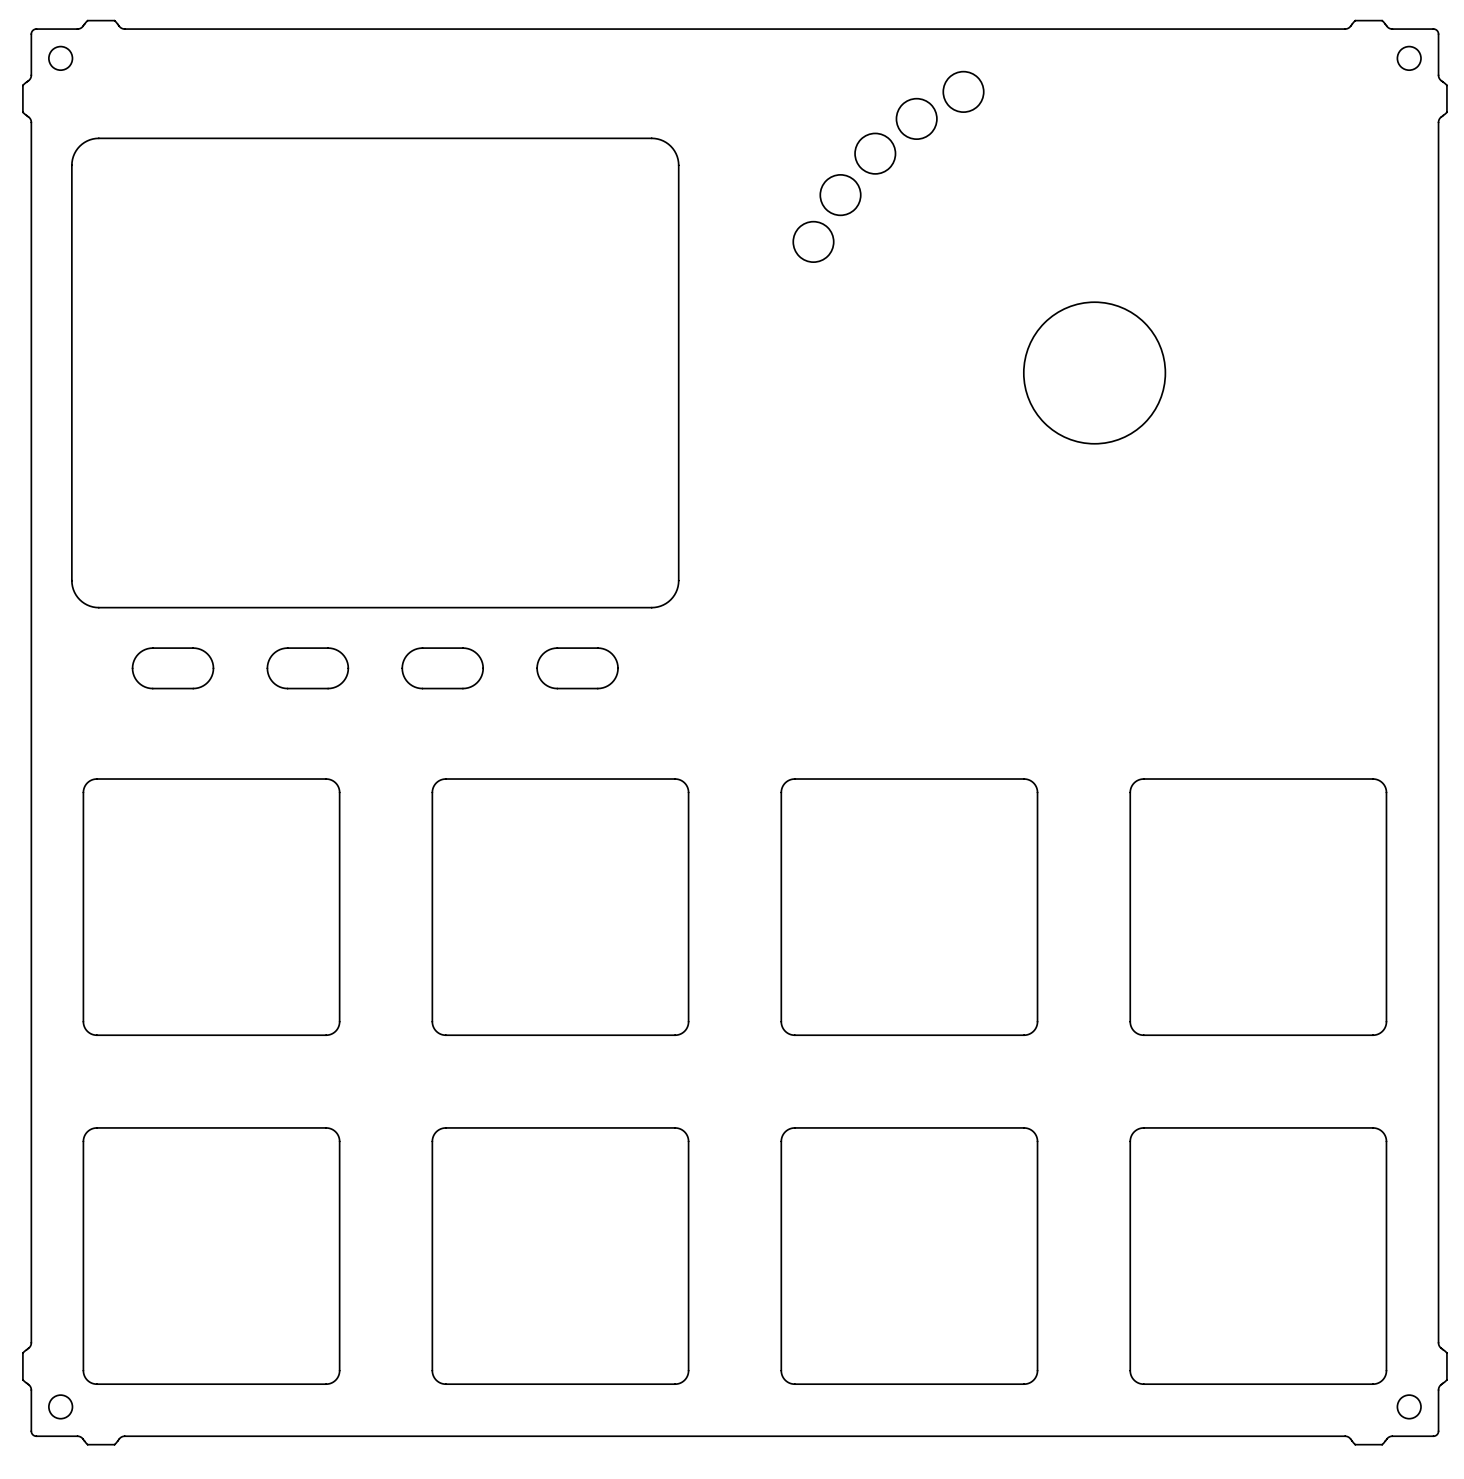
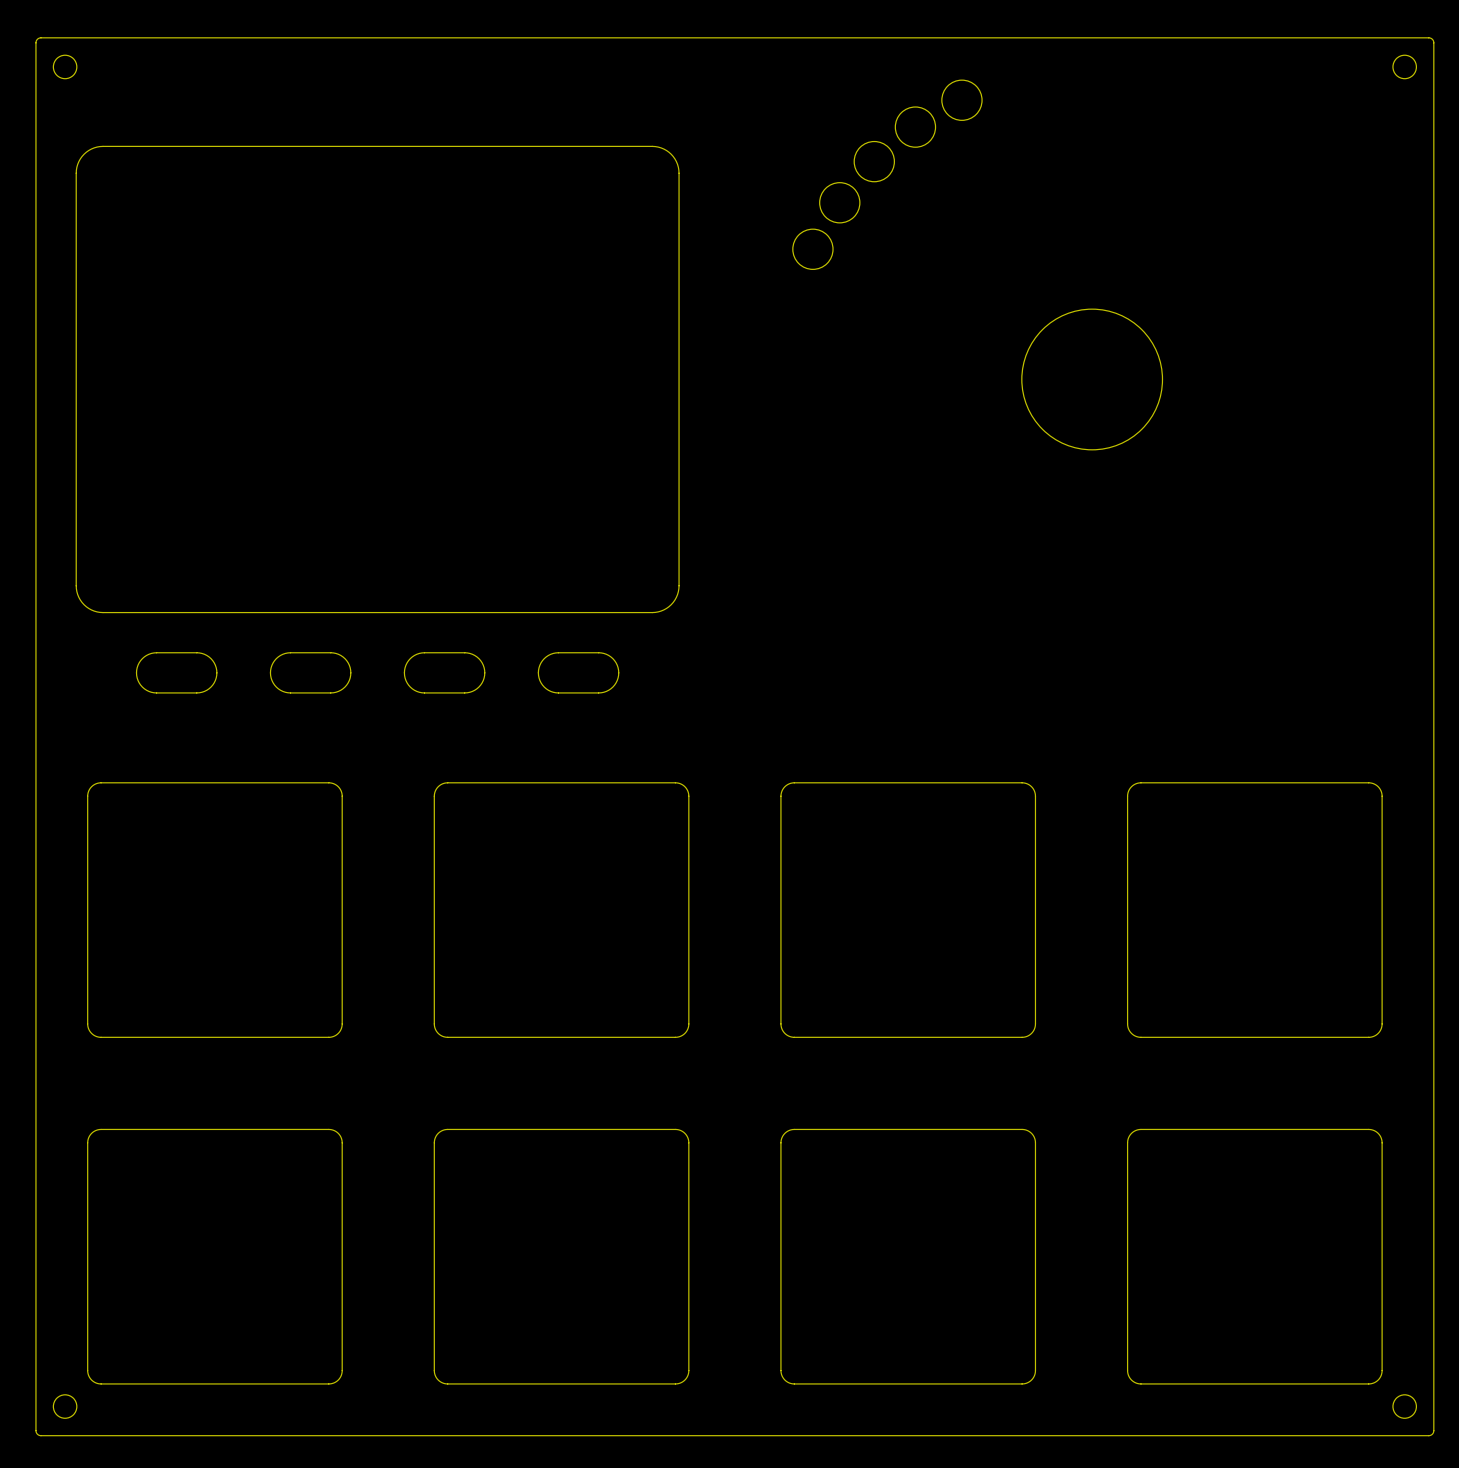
drawing shape: [22, 20, 1448, 1446] -> [35, 37, 1435, 1437]

